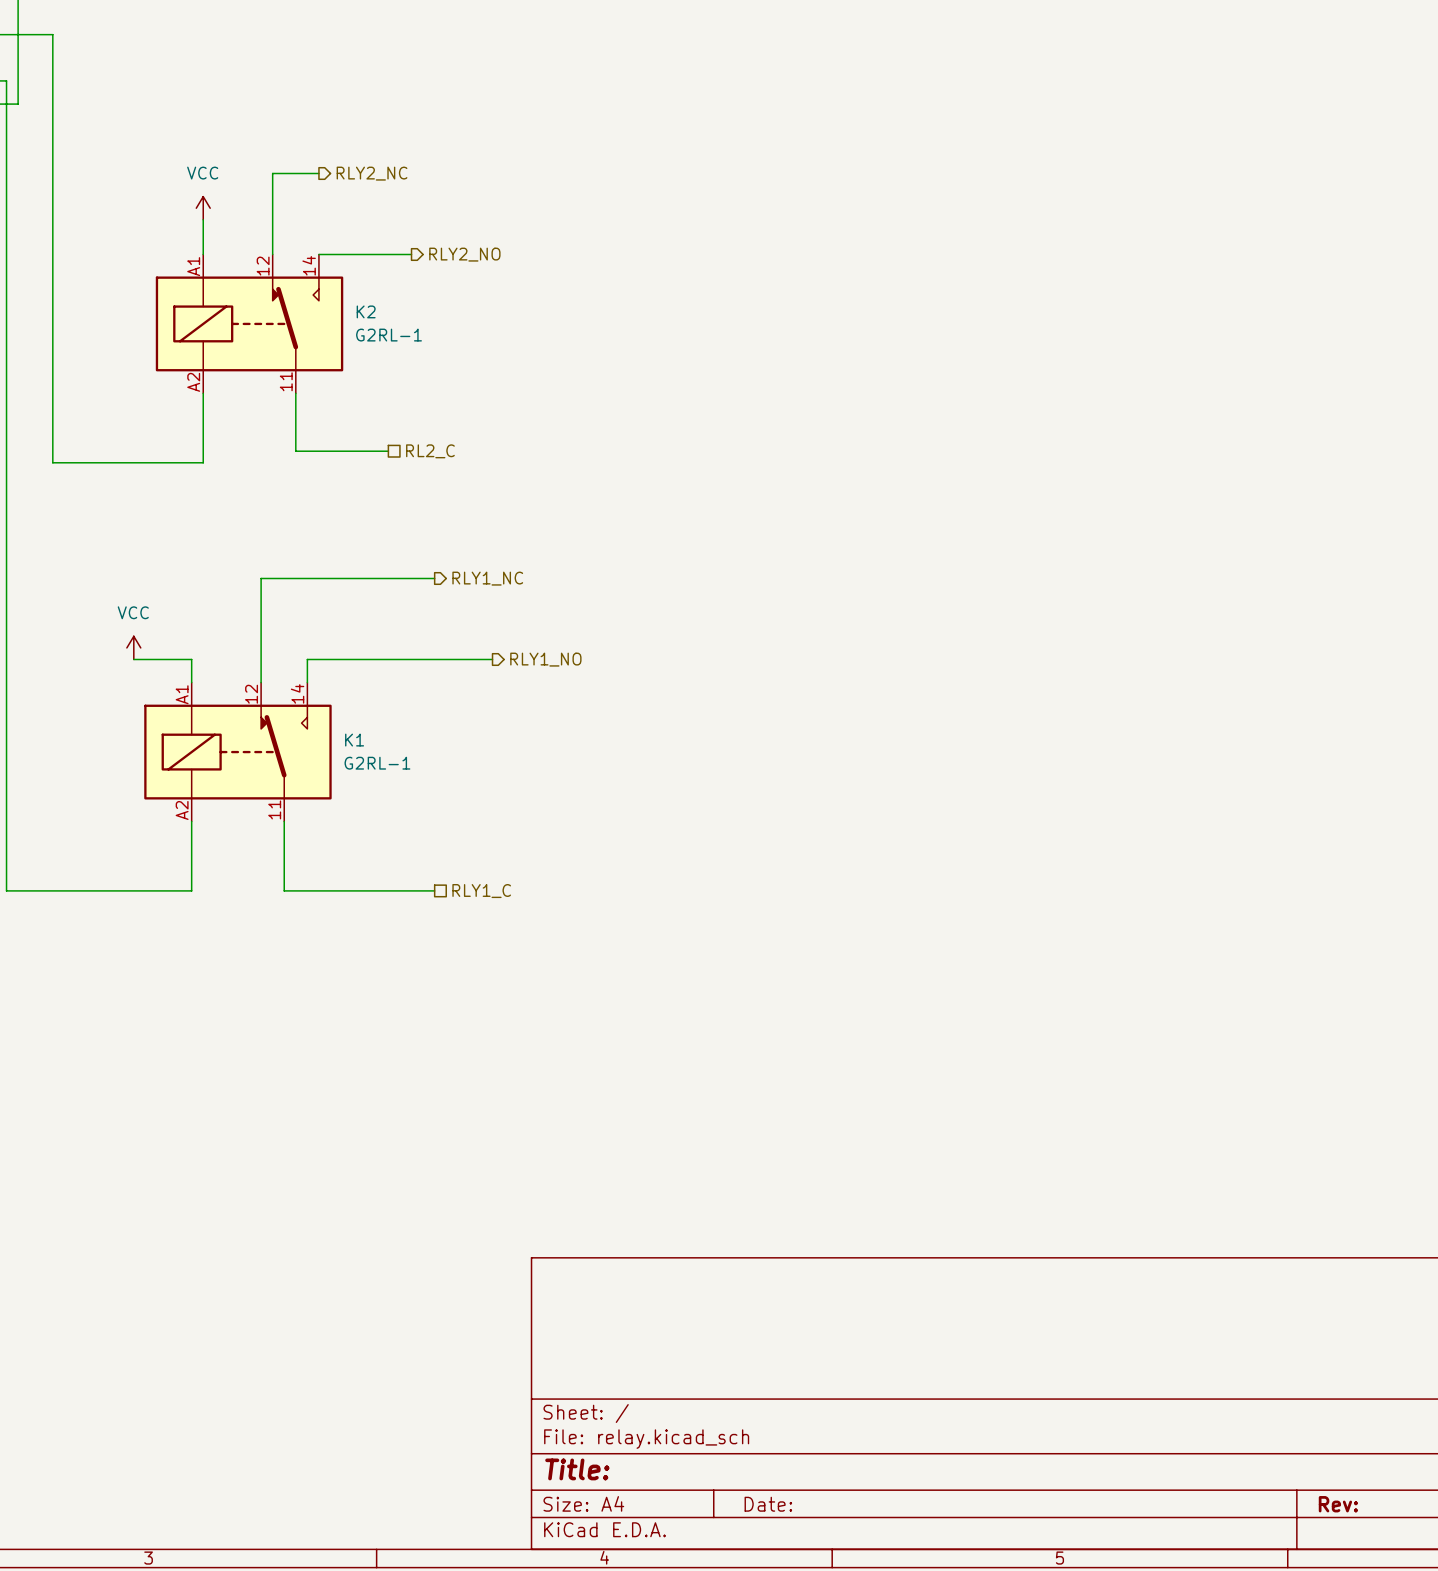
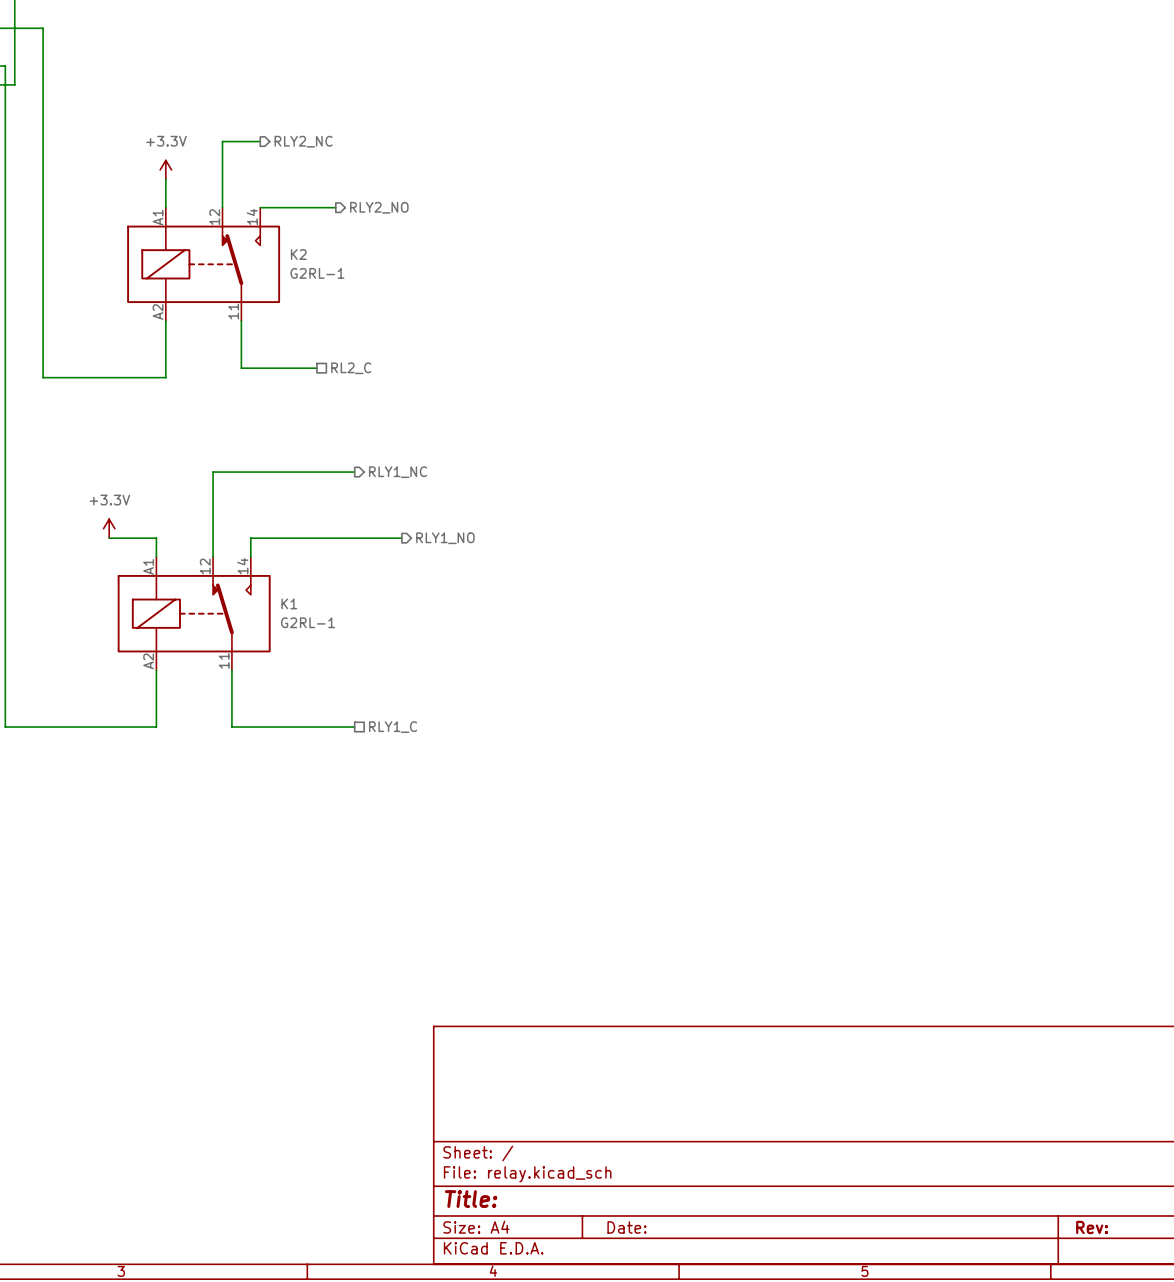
power symbol: VCC (203, 208) -> +3.3V (165, 169)
power symbol: VCC (133, 647) -> +3.3V (109, 528)

